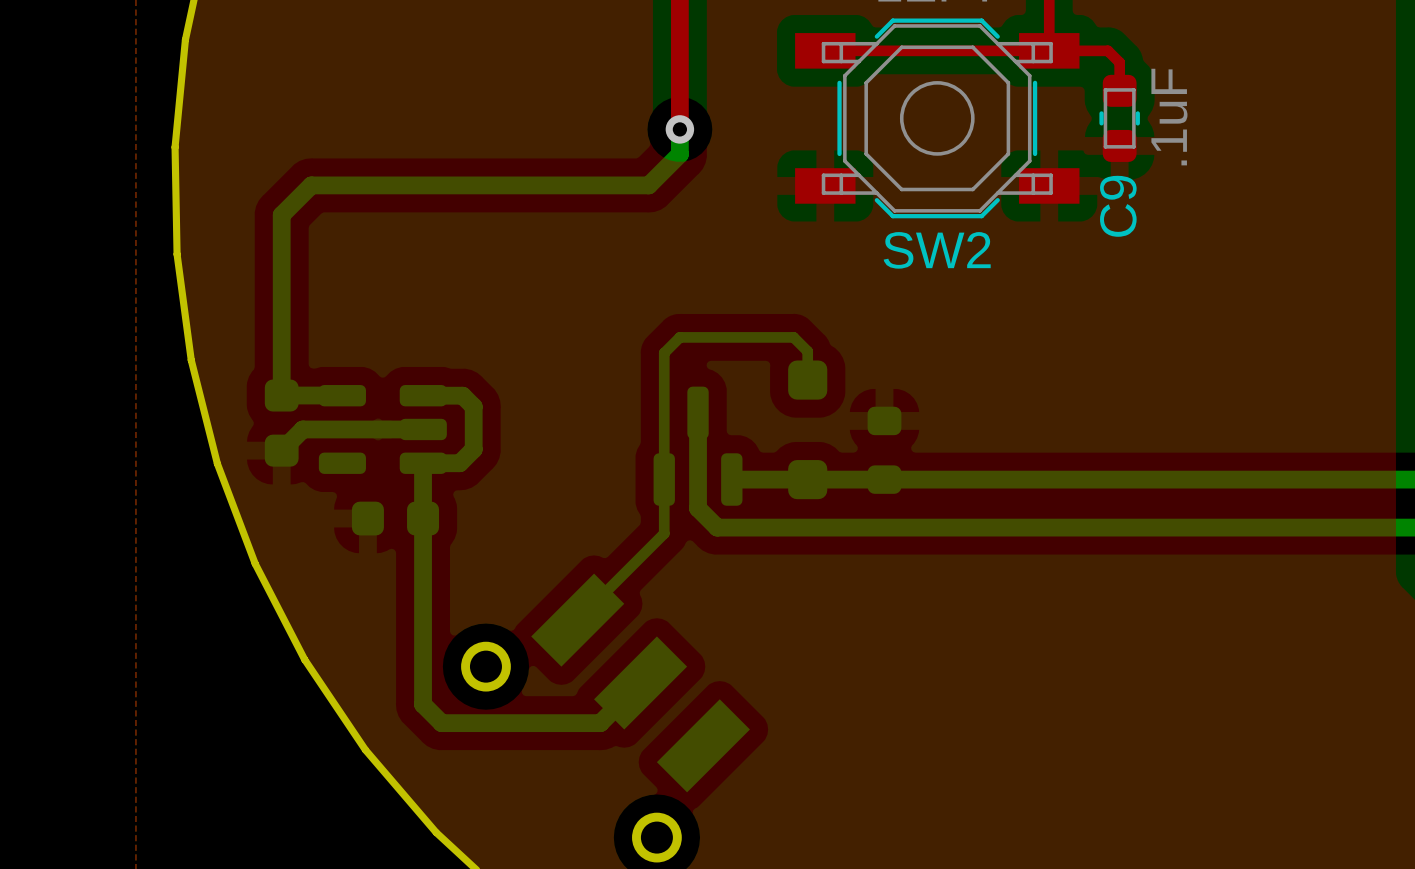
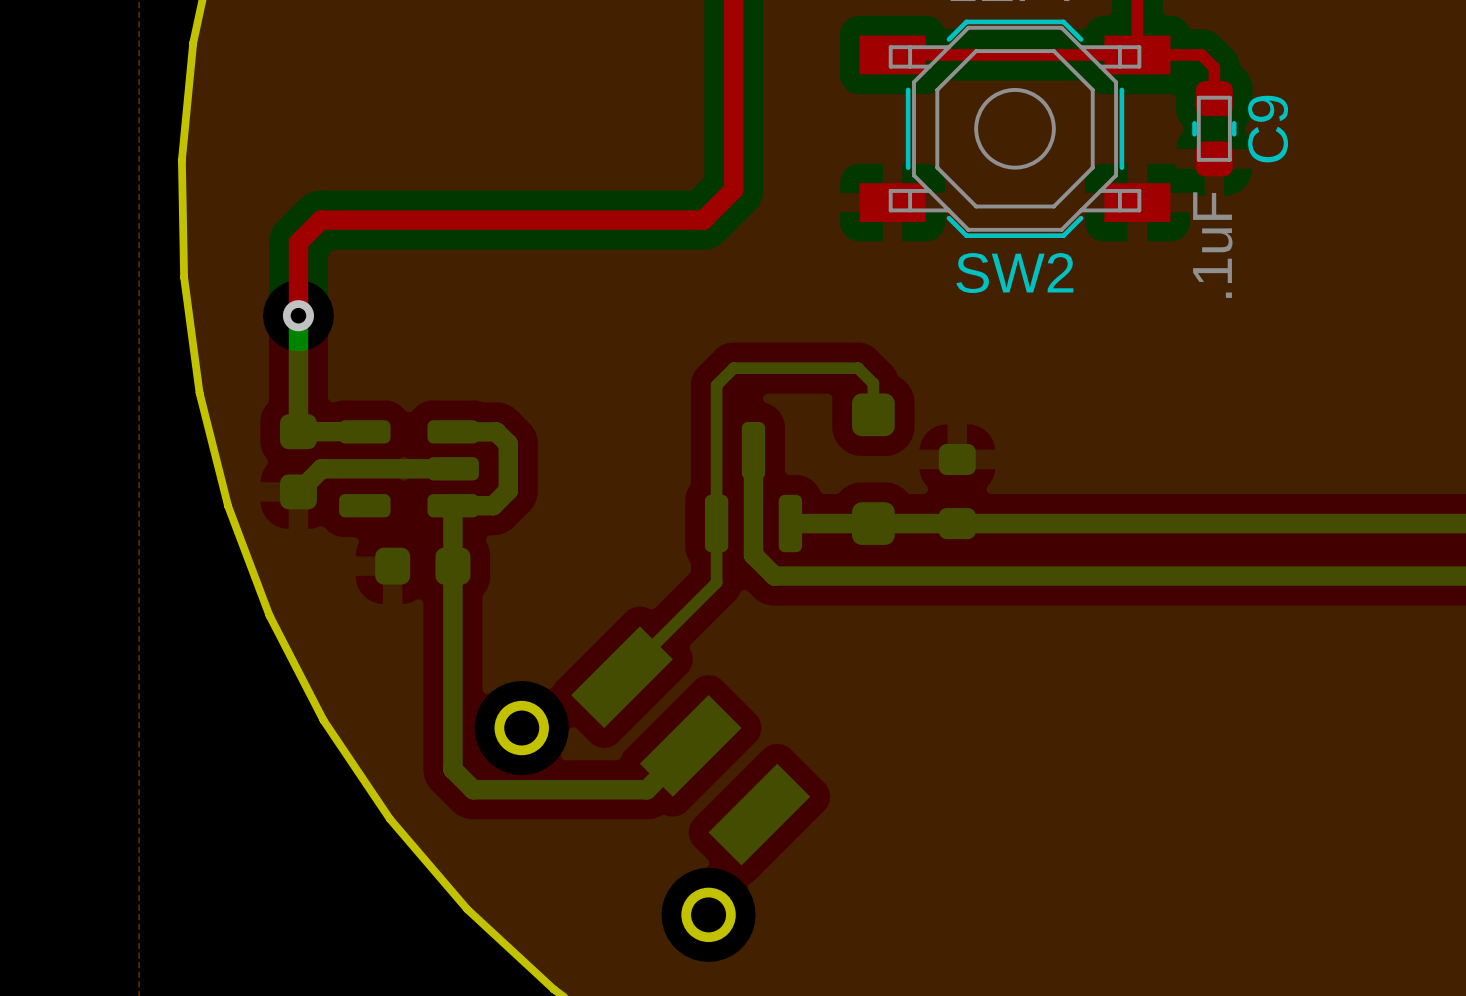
C9 value position: .1uF (1169, 117) -> .1uF (1212, 245)
bottom track: (679, 129) (679, 154) (648, 185) (311, 185) (281, 215) (281, 289) -> none
top track: none -> (733, 140) (733, 189) (703, 220) (321, 220) (298, 242) (298, 315)
via: (679, 129) -> none
C9 name position: C9 (1118, 206) -> C9 (1268, 129)
via: none -> (298, 315)

